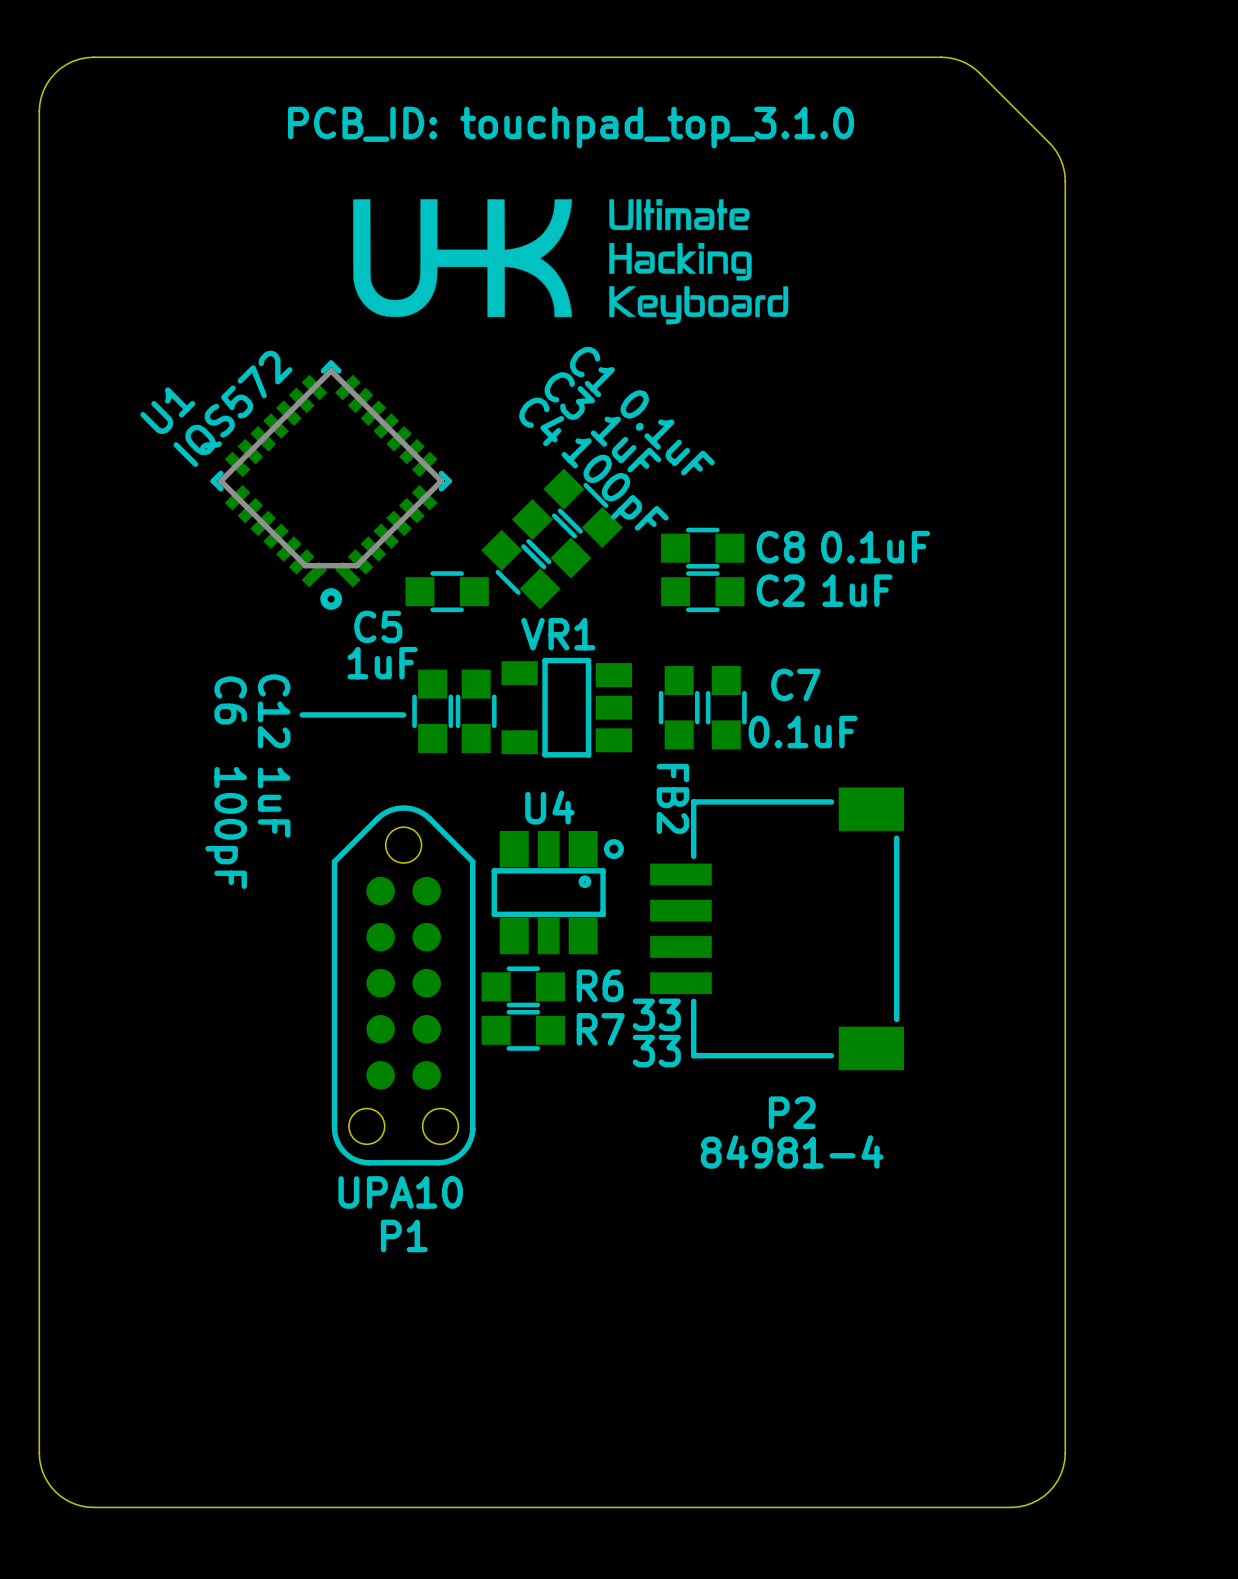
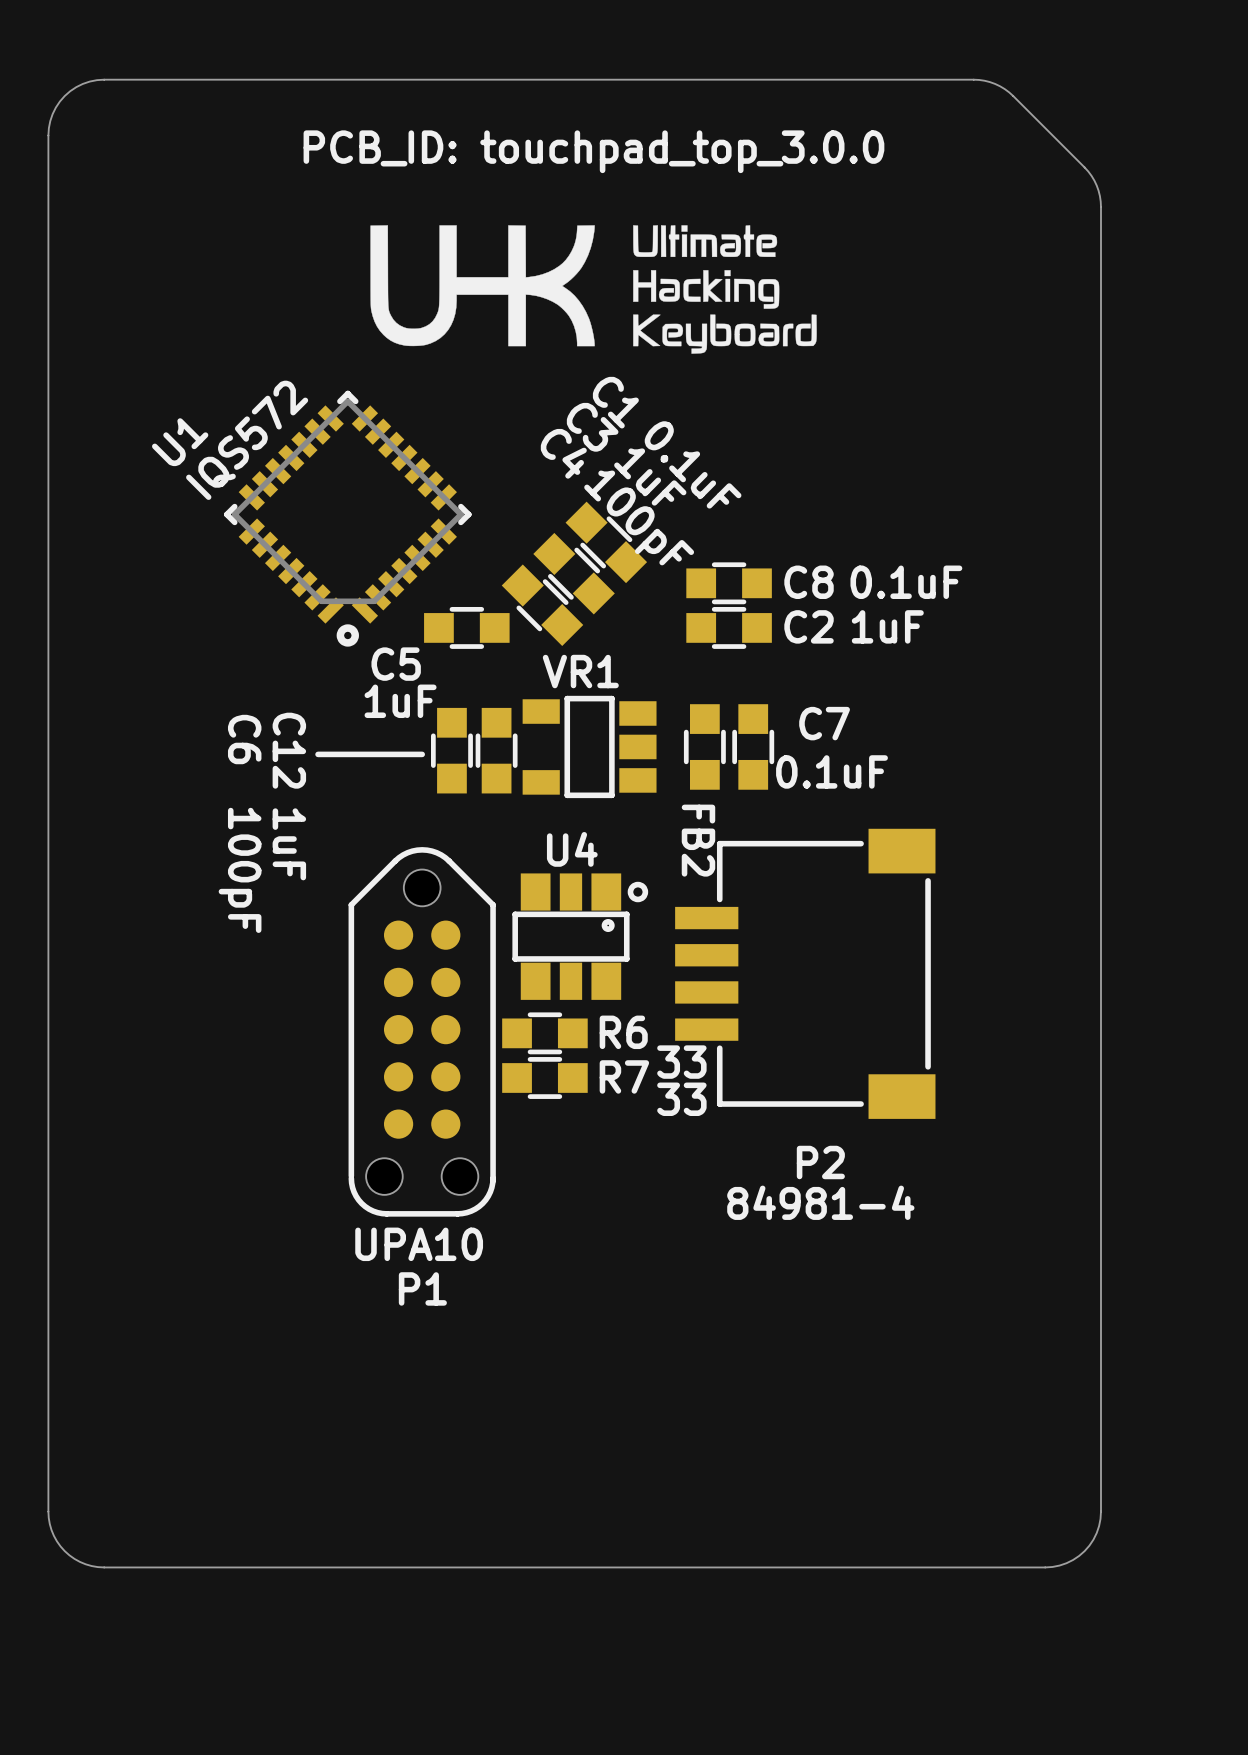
text: PCB_ID: touchpad_top_3.1.0 (571, 127) -> PCB_ID: touchpad_top_3.0.0 (593, 151)

